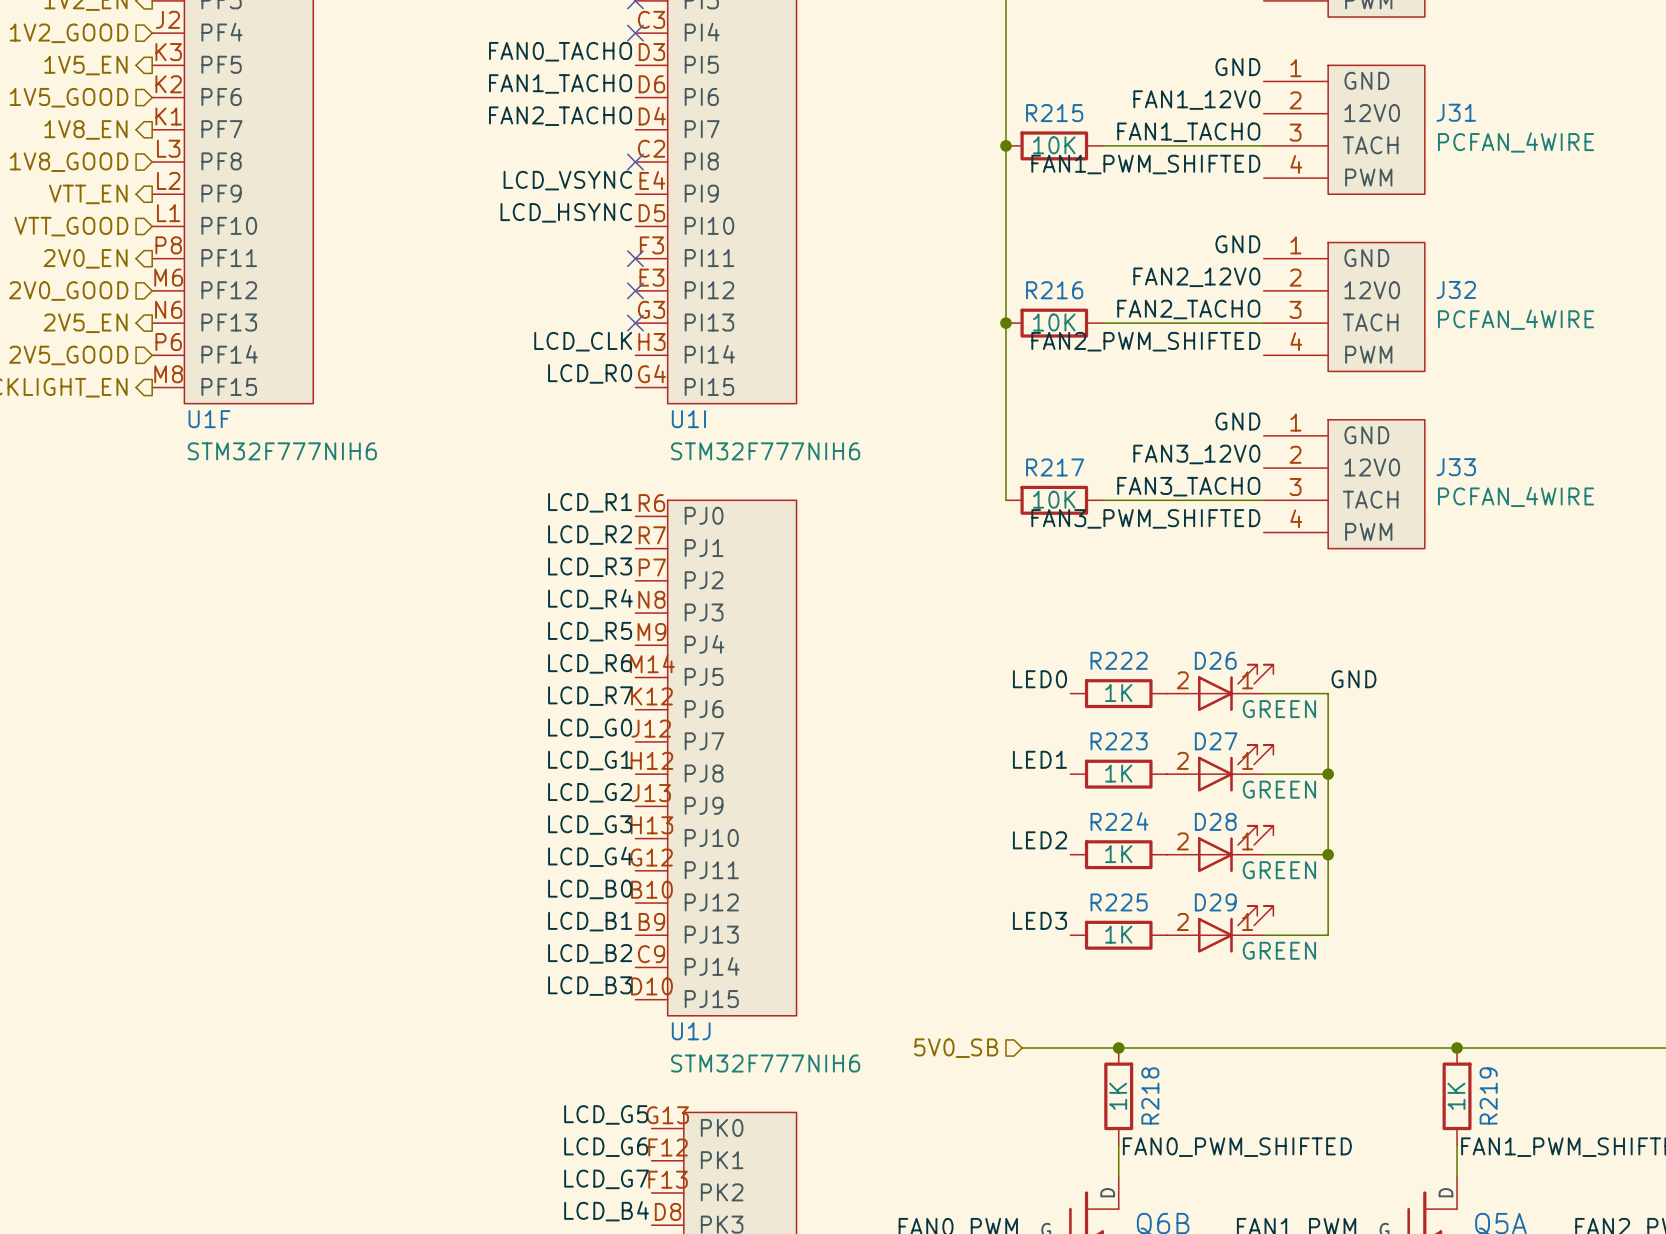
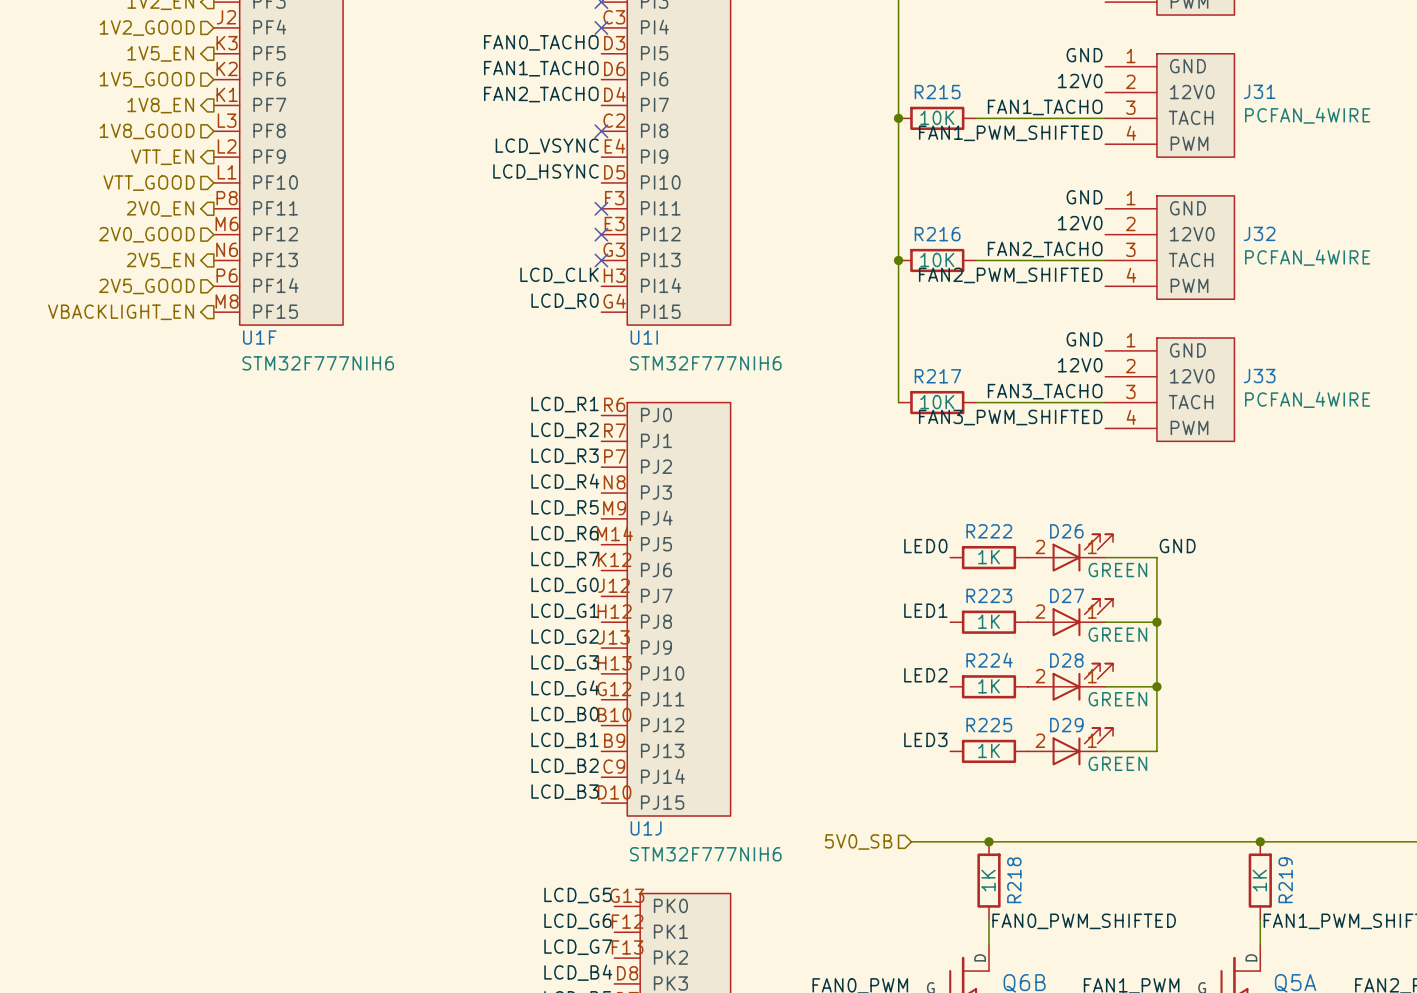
label: FAN1_12V0 (1196, 100) -> 12V0 (1080, 81)
label: FAN2_12V0 (1196, 277) -> 12V0 (1080, 223)
label: FAN3_12V0 (1196, 454) -> 12V0 (1080, 365)

